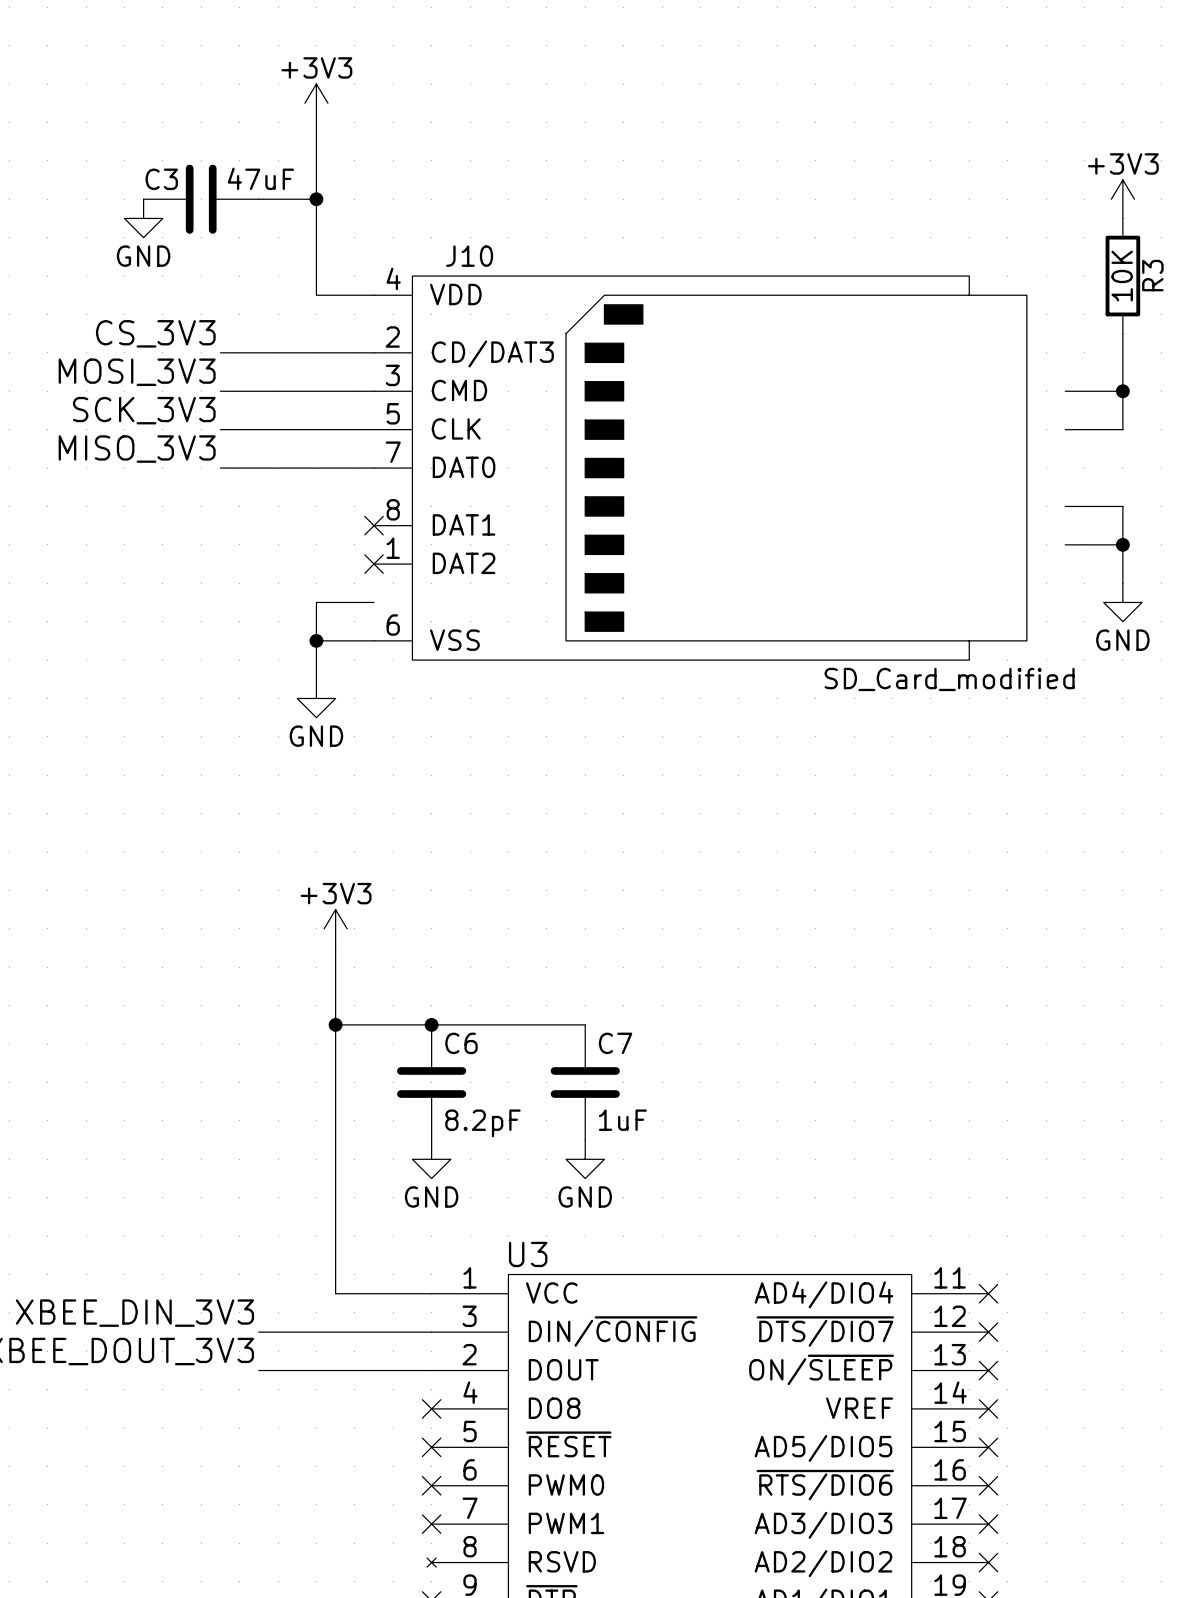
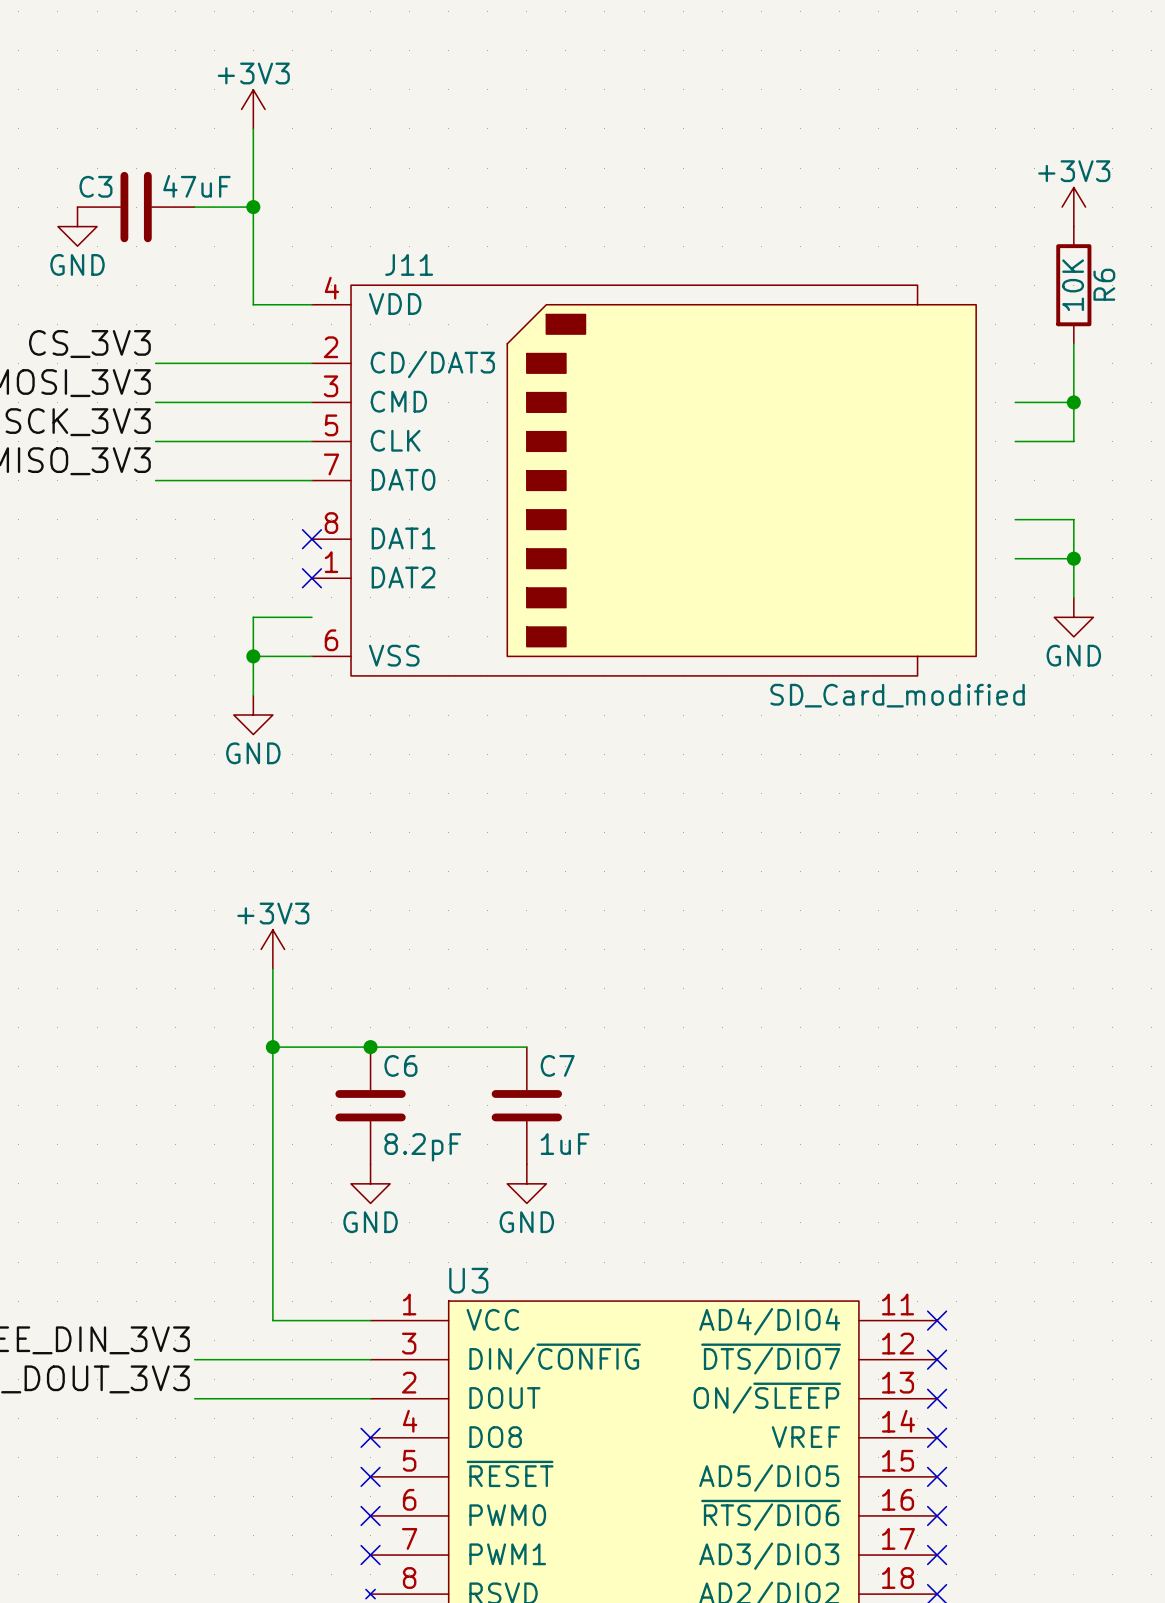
J10 name: J10 (469, 256) -> J11 (409, 264)
R3 name: R3 (1152, 275) -> R6 (1104, 284)

